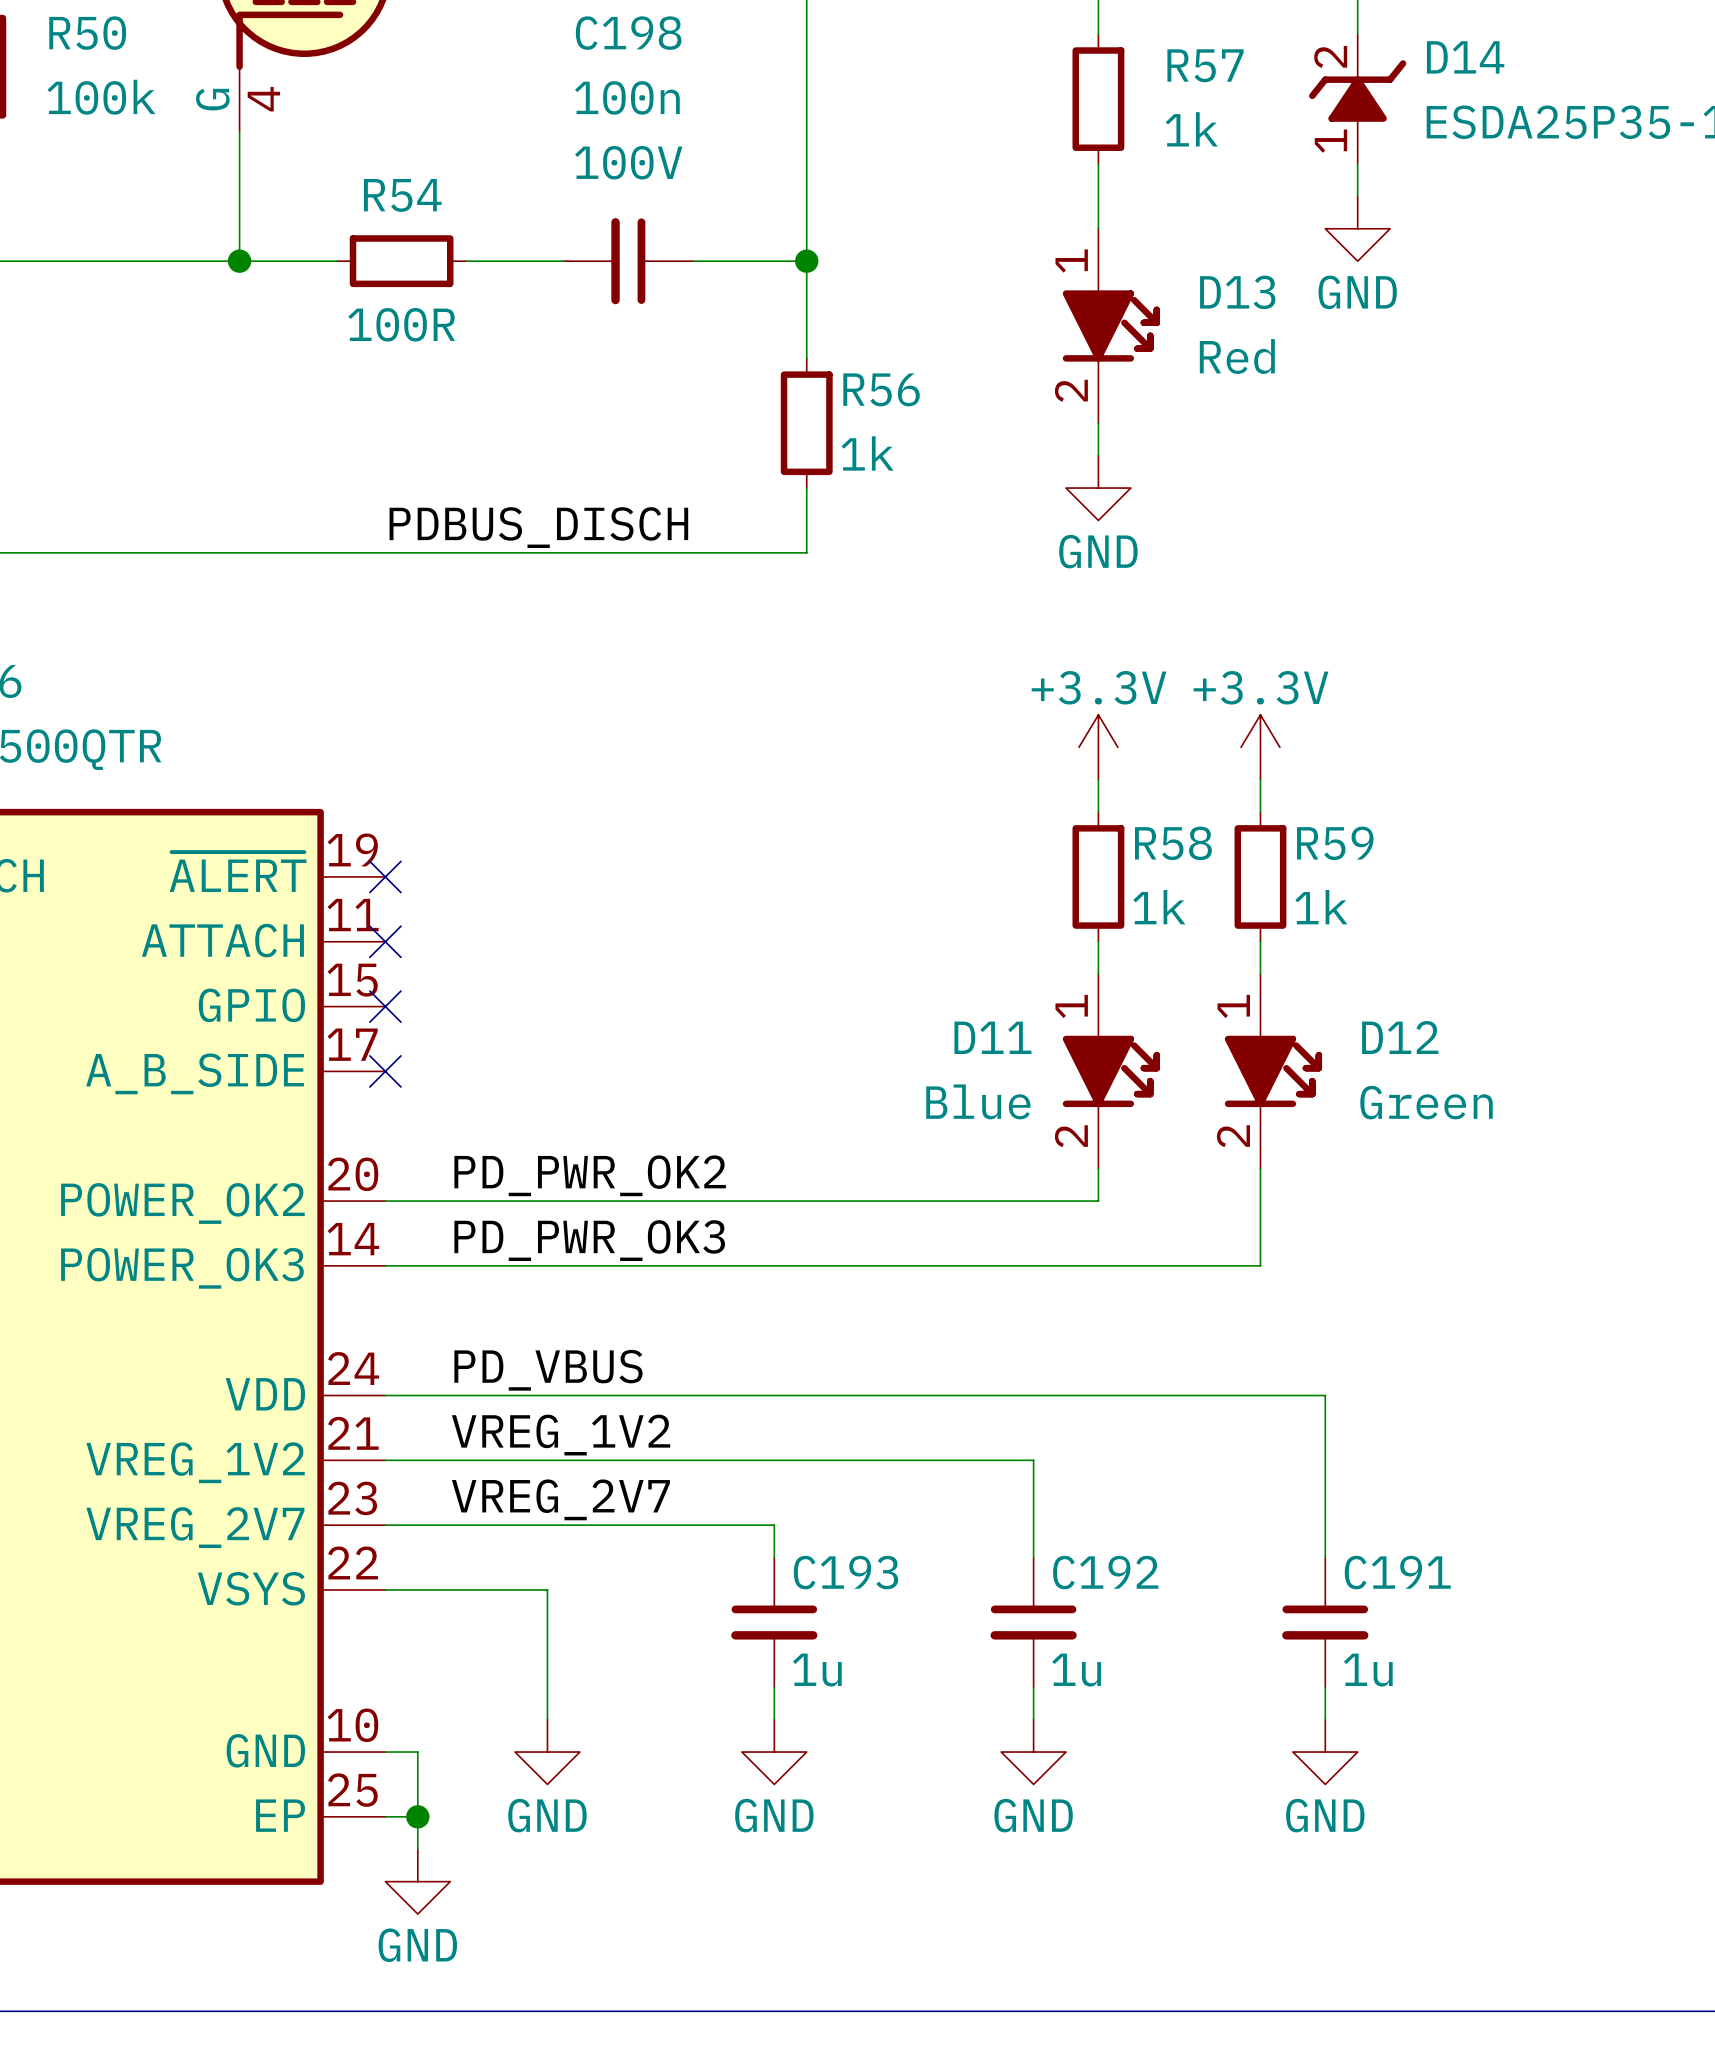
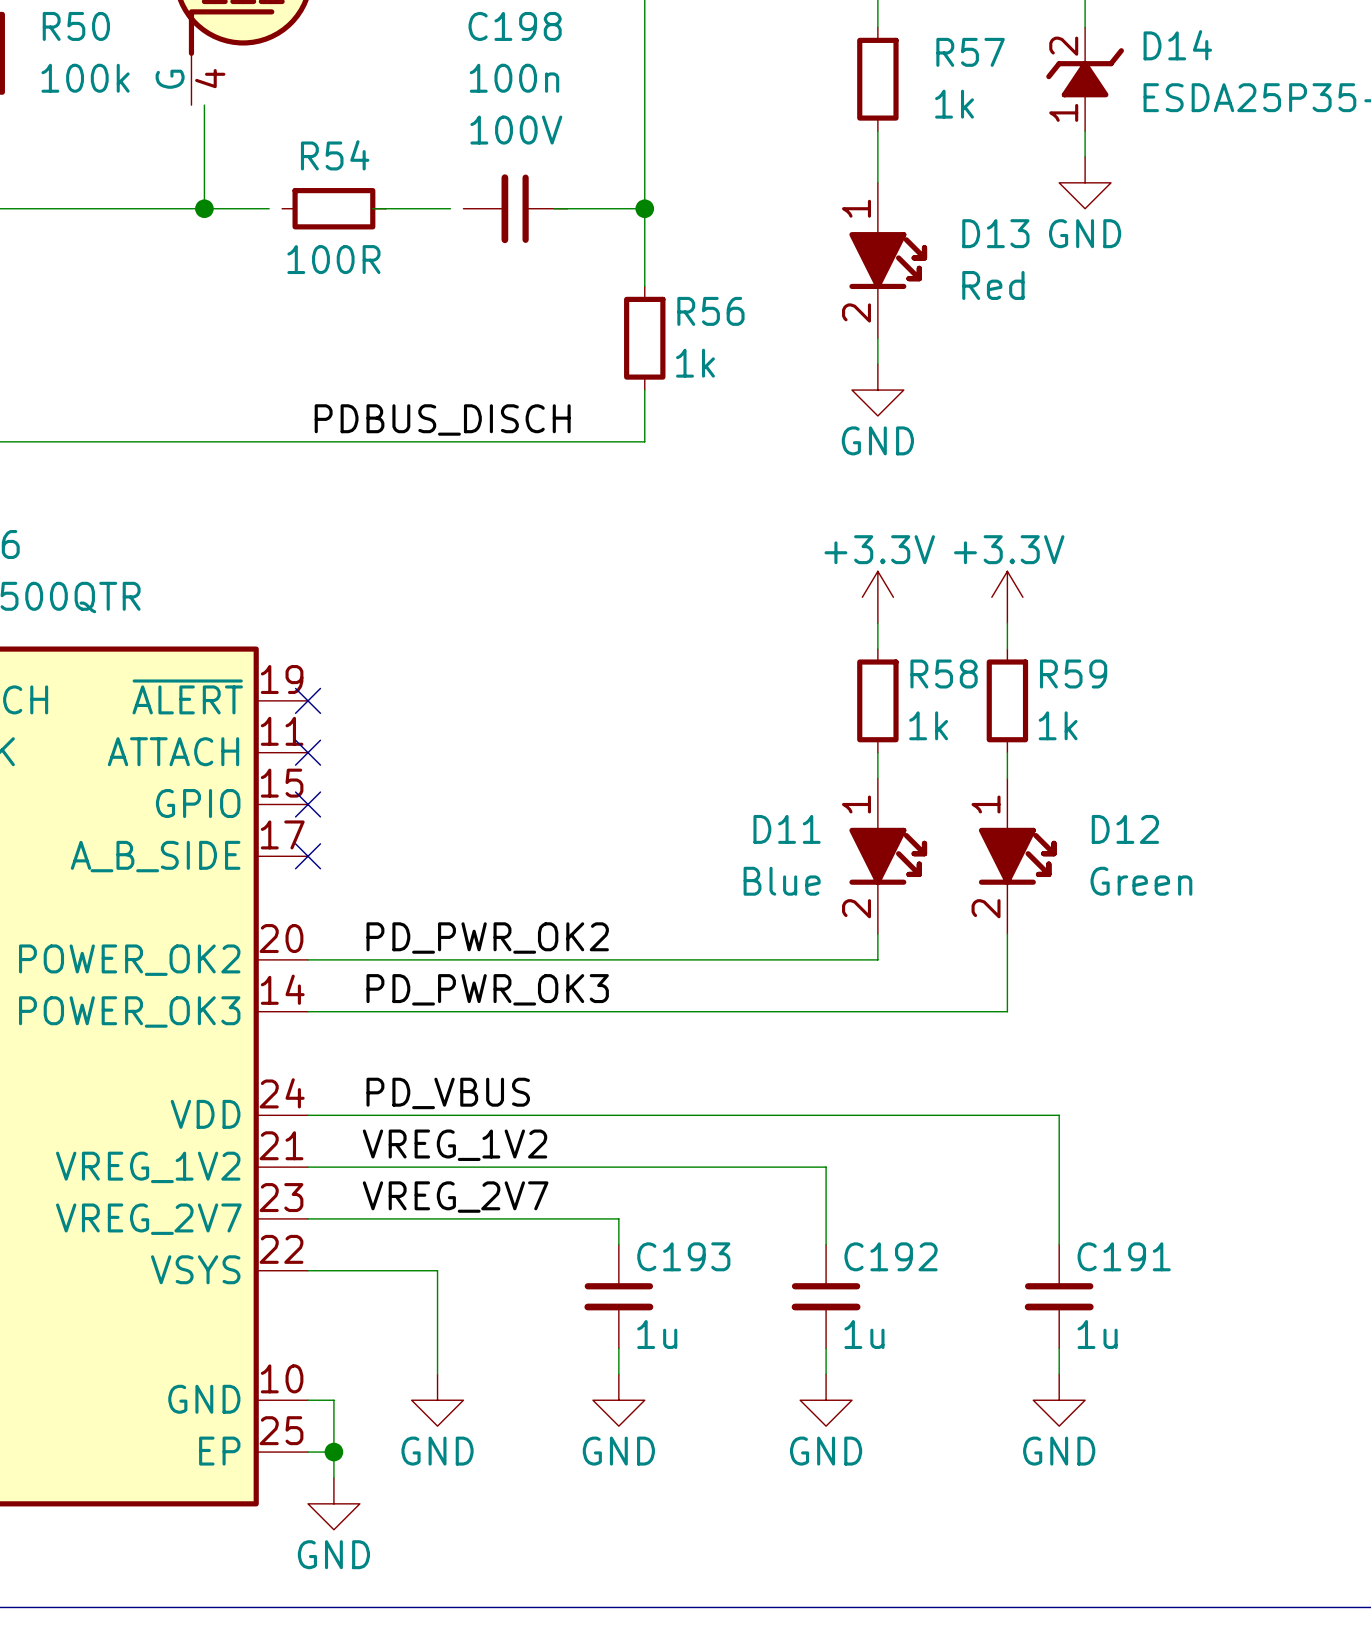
wire: (239, 131) (239, 261) -> (204, 105) (204, 208)
junction position: (239, 261) -> (204, 208)
R54 position: (401, 261) -> (333, 208)
C198 position: (628, 261) -> (515, 208)

